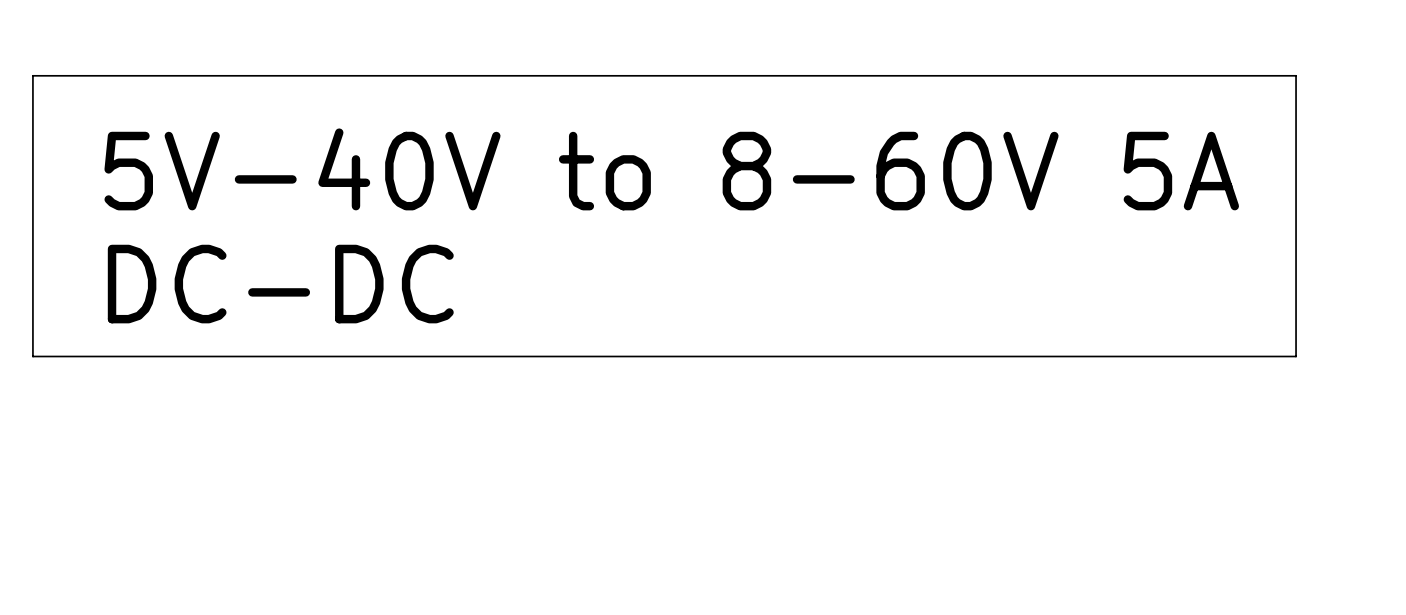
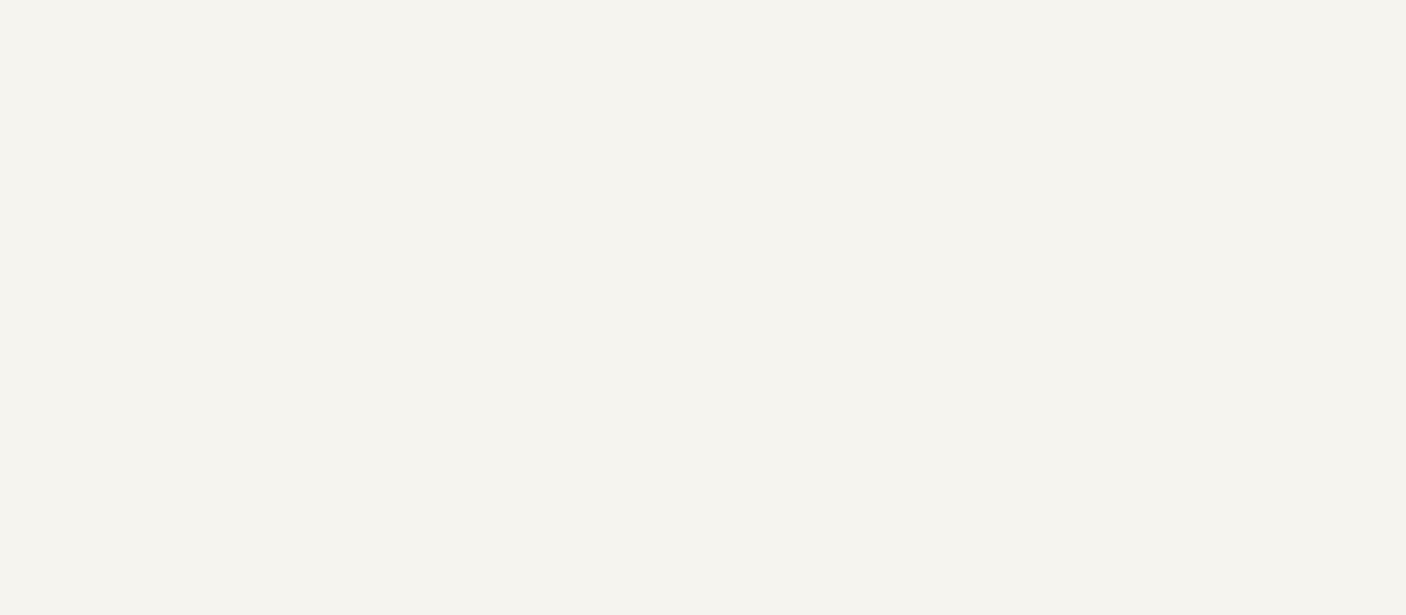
line: (32, 75) (1296, 75) (1296, 356) (32, 356) (32, 75) -> none
text: 5V-40V to 8-60V 5A (671, 169) -> none
text: DC-DC (280, 284) -> none

